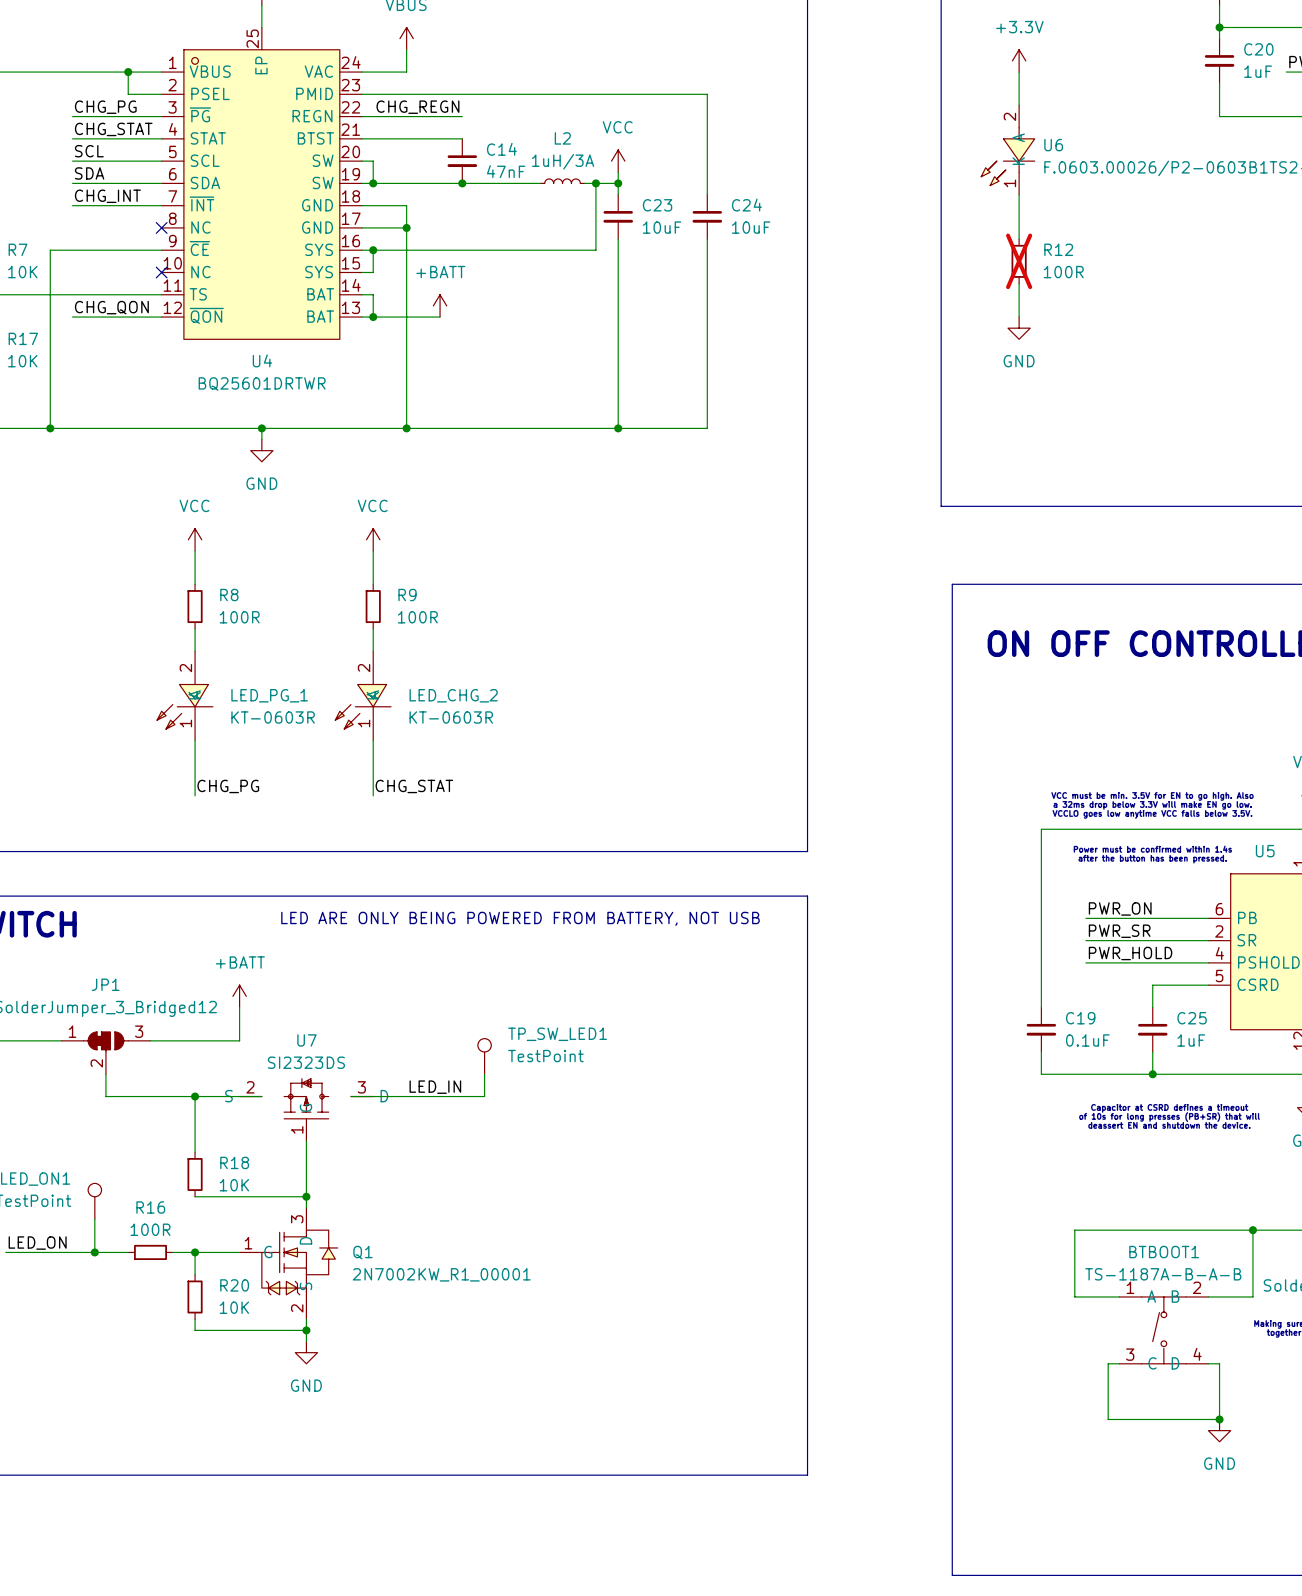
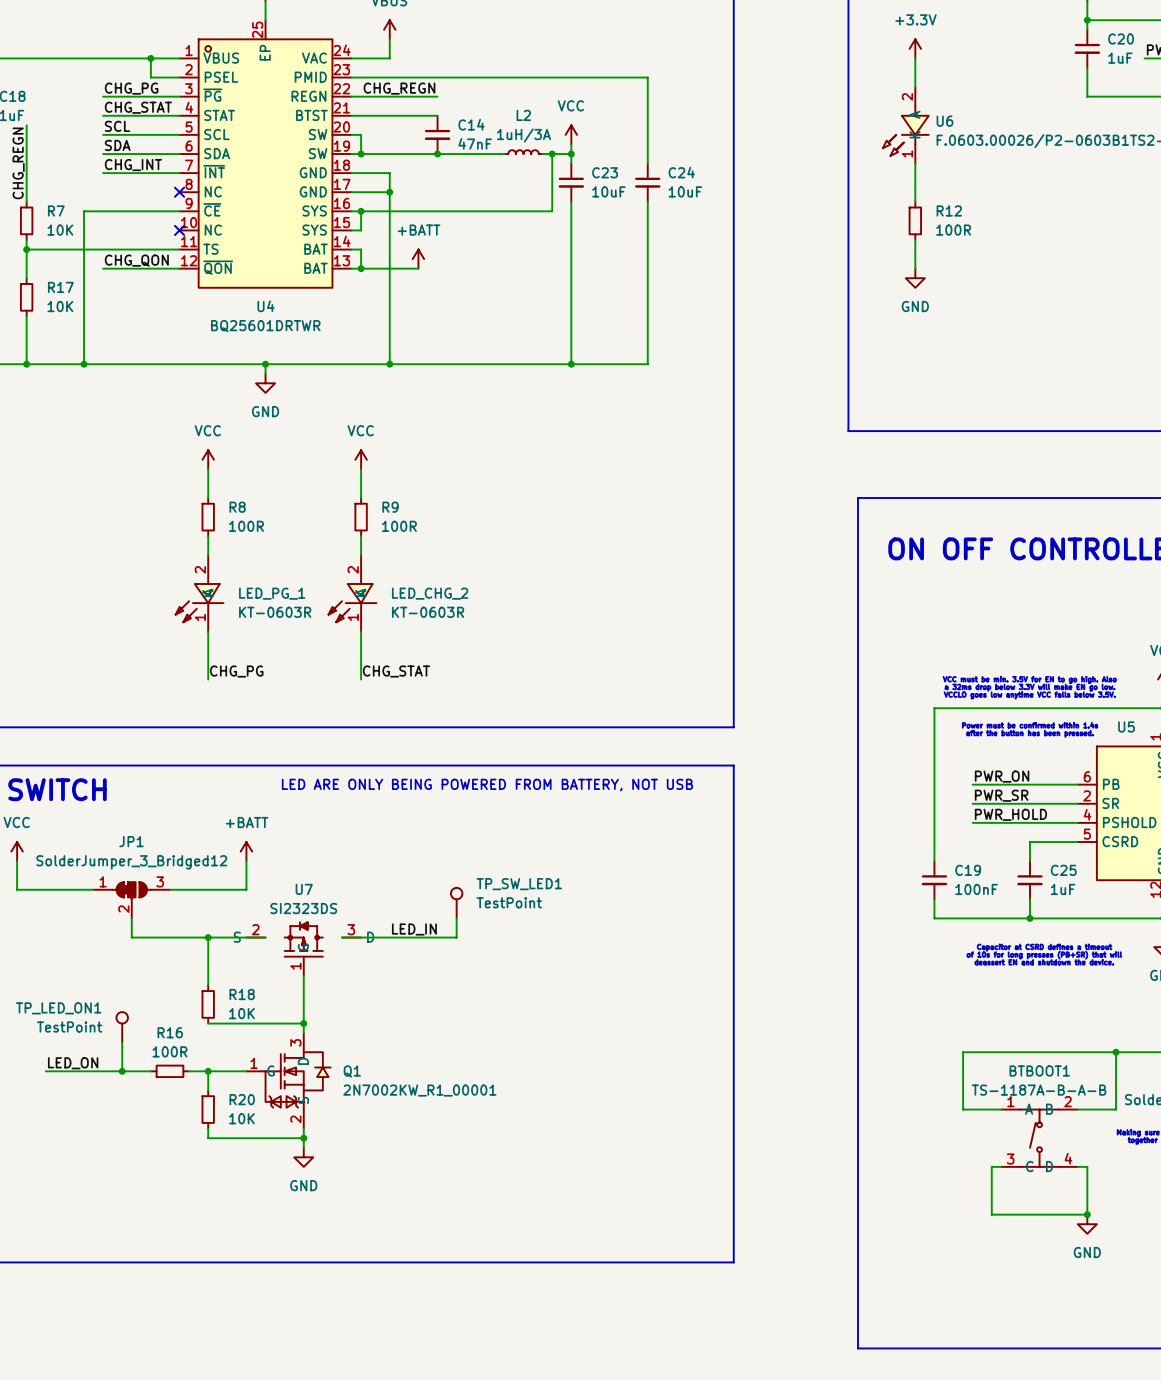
R12 do-not-place cross: (1019, 261) -> none
C19 value: 0.1uF (1087, 1040) -> 100nF (976, 889)

